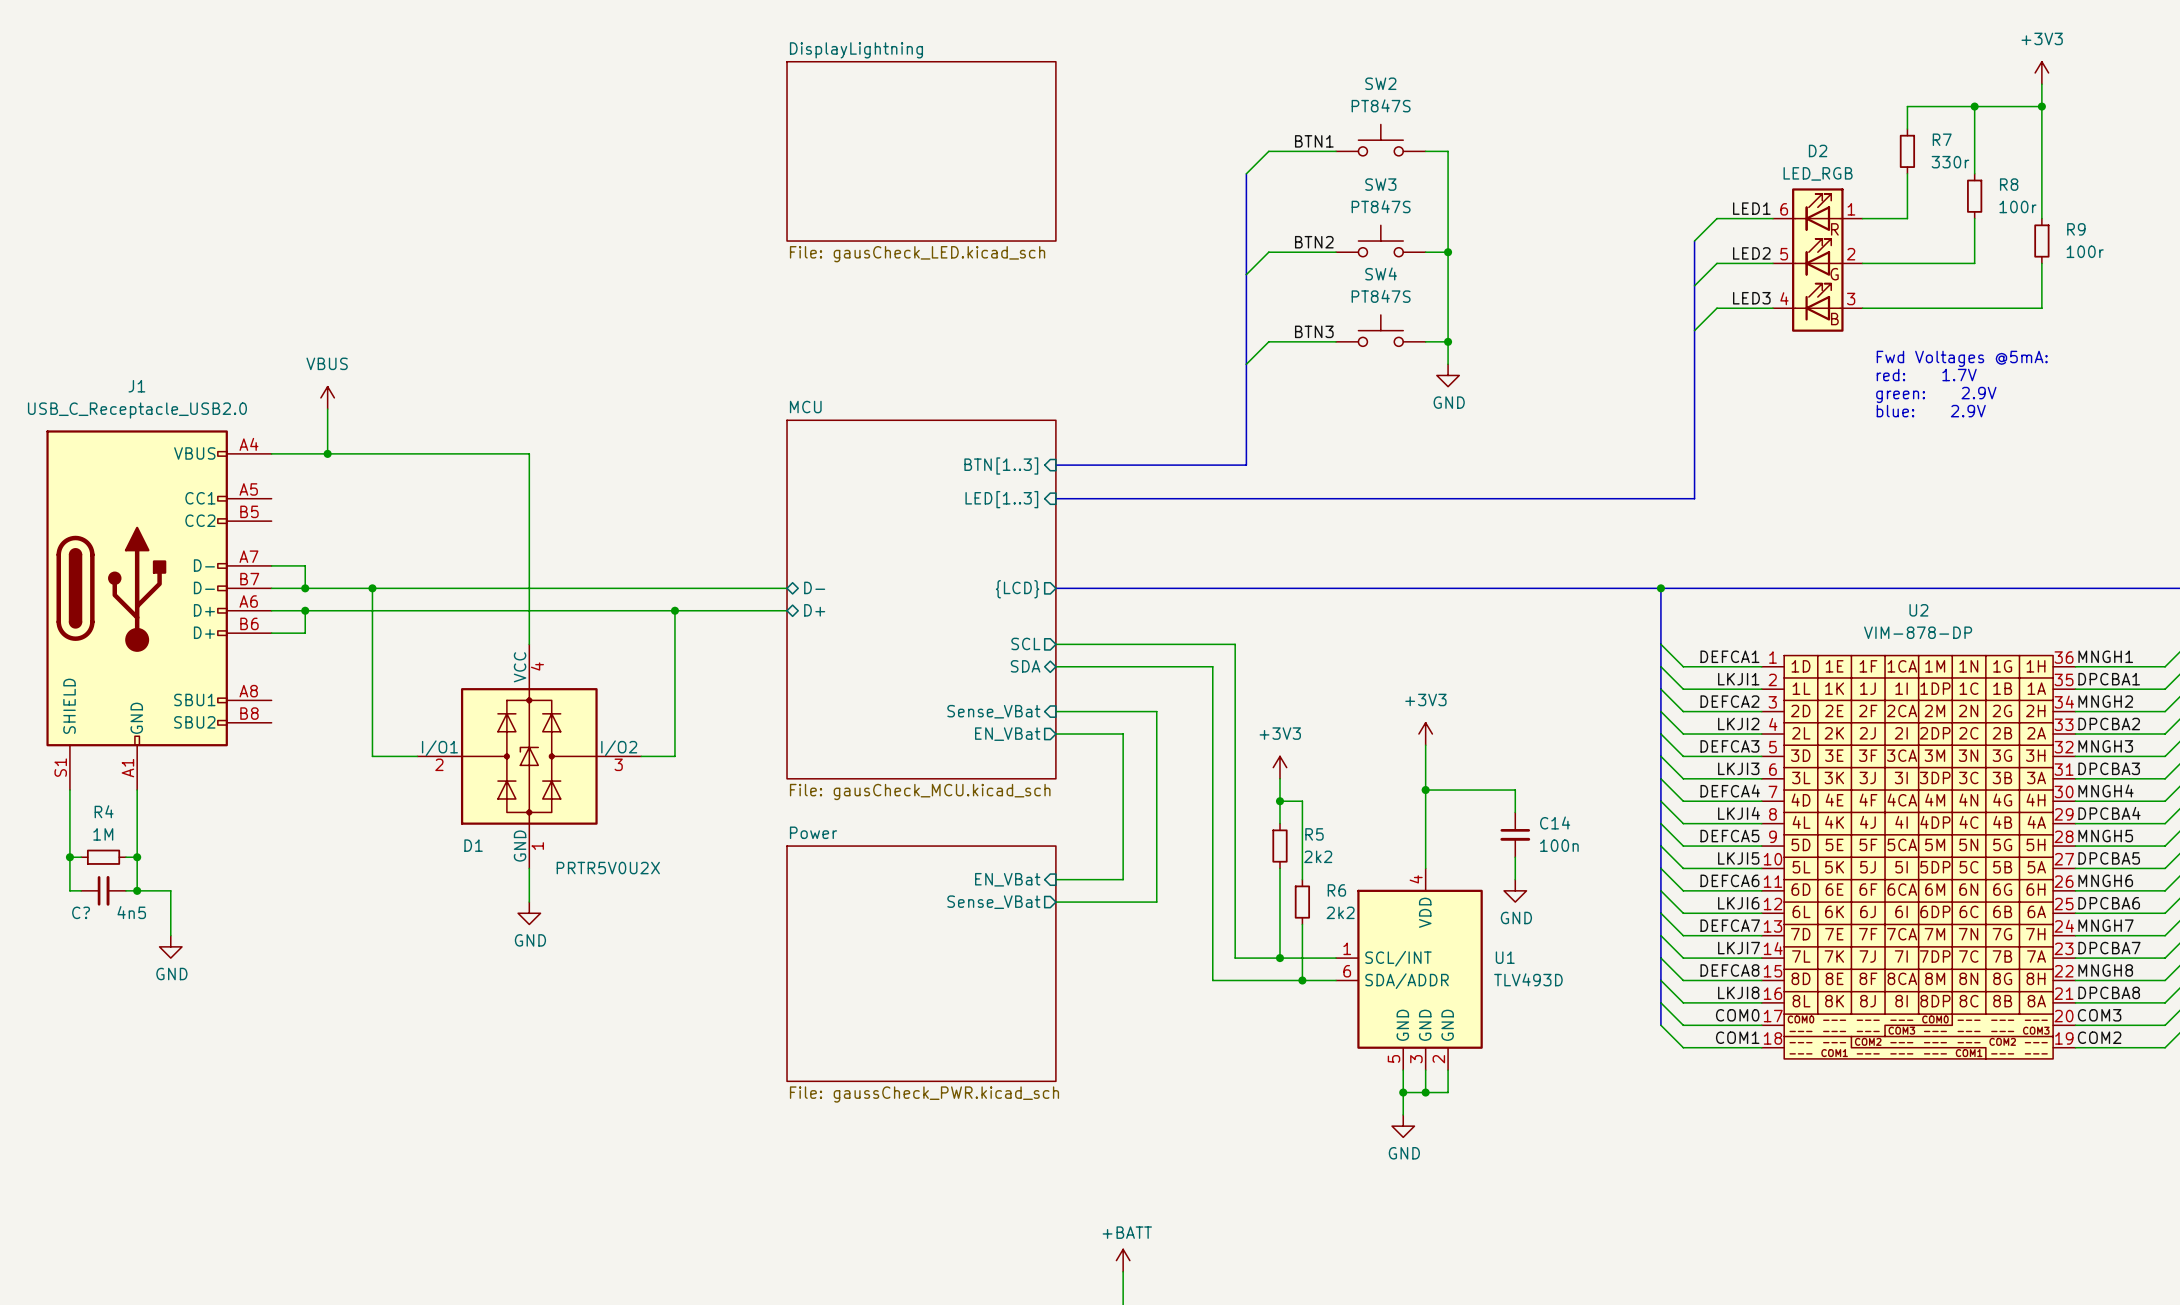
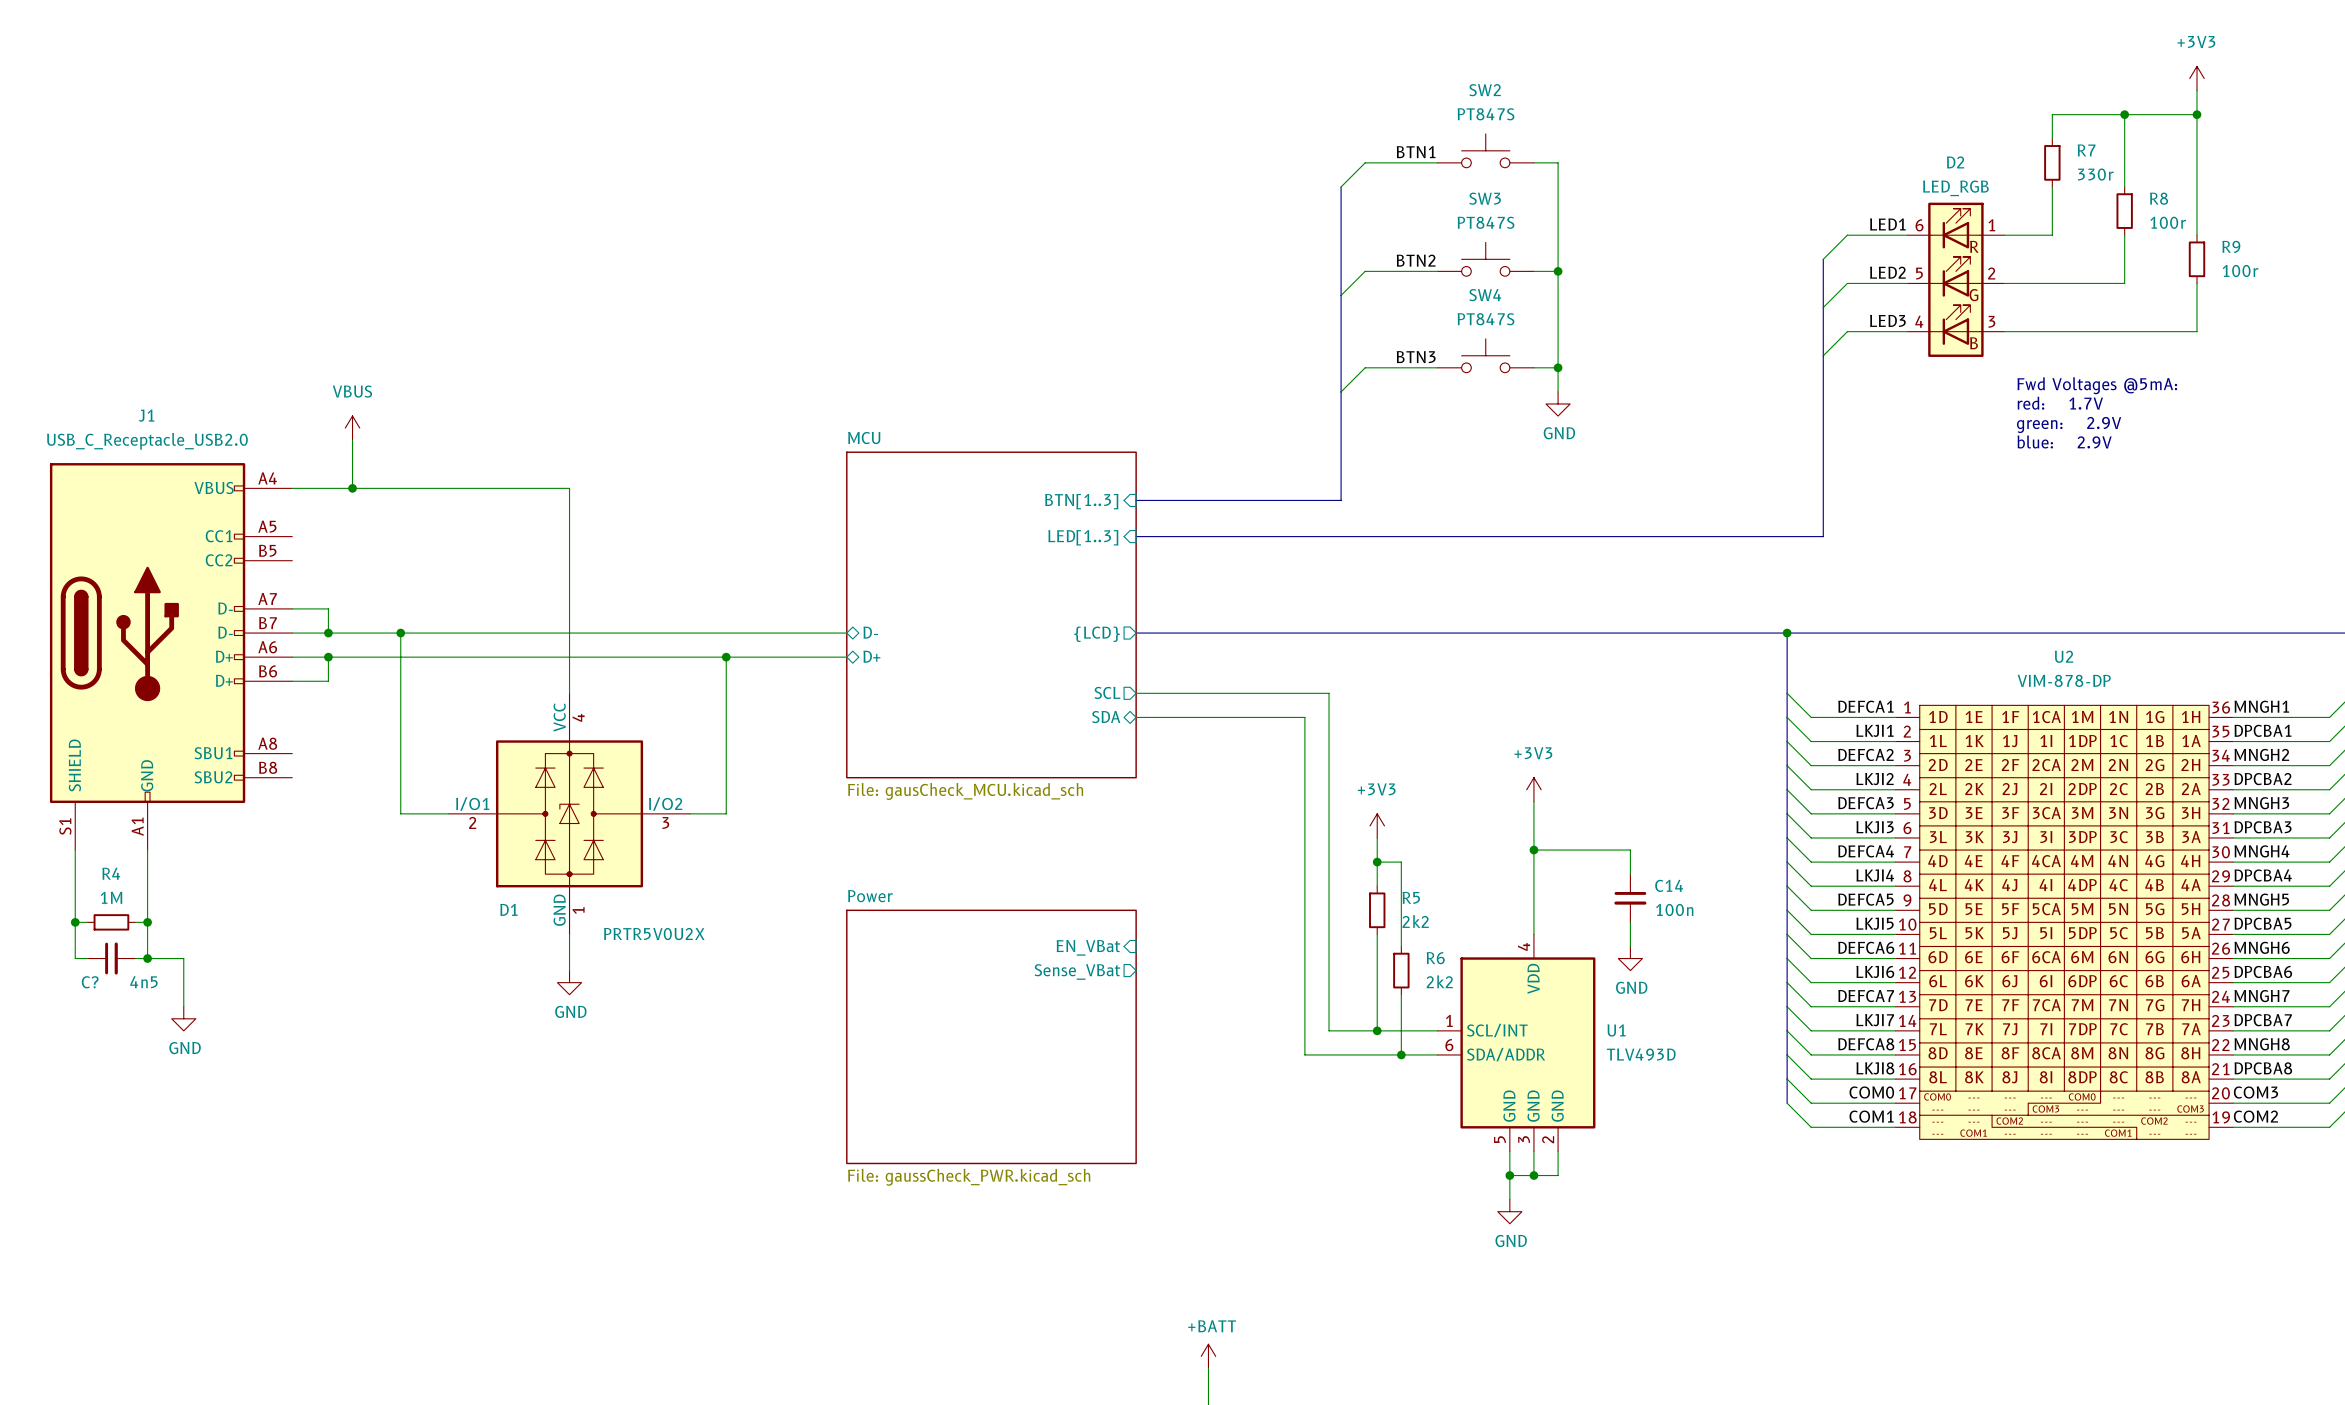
sheet DisplayLightning: File: gausCheck_LED.kicad_sch (921, 151) -> none
sheet MCU: none -> File: gausCheck_MCU.kicad_sch (991, 614)
sheet MCU: File: gausCheck_MCU.kicad_sch (921, 599) -> none
sheet pin: Sense_VBat (993, 711) -> none
wire: (1055, 711) (1156, 711) (1156, 902) (1055, 902) -> none
sheet pin: EN_VBat (1007, 734) -> none
wire: (1055, 734) (1123, 734) (1123, 879) (1055, 879) -> none

